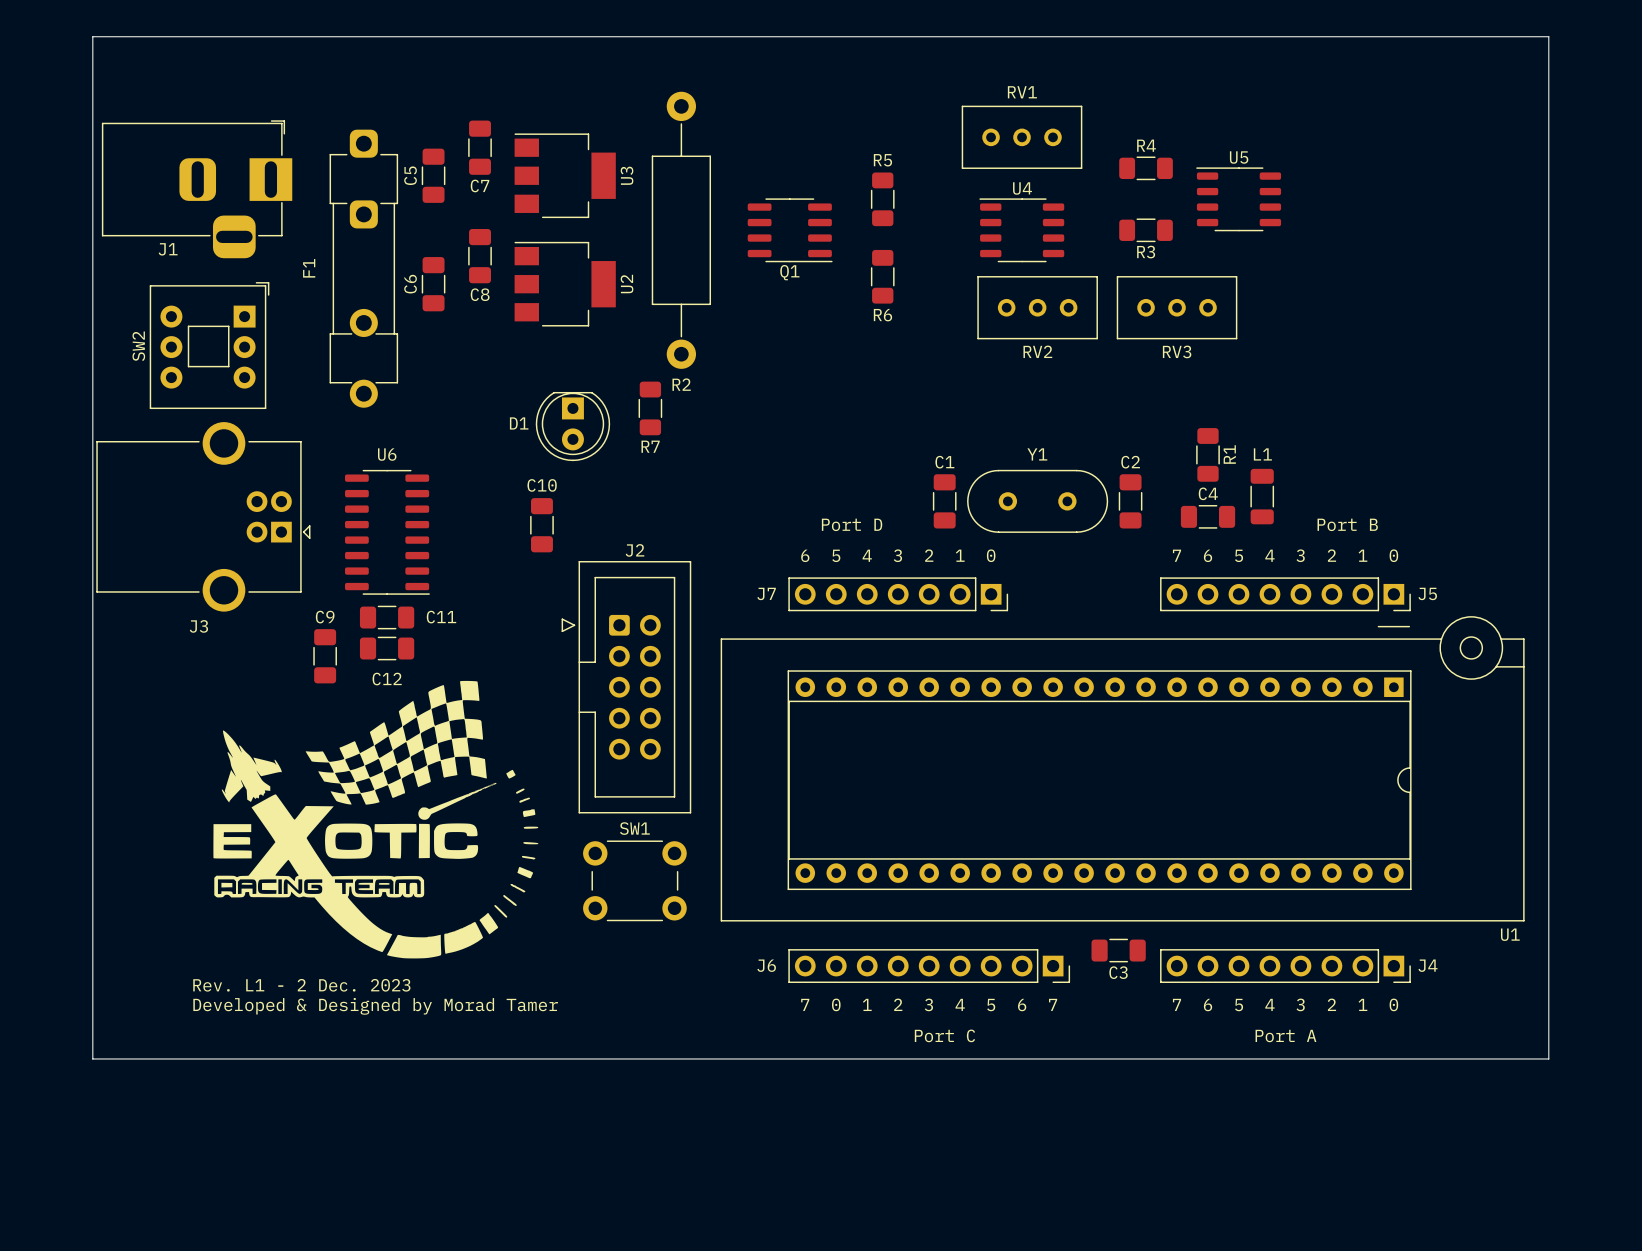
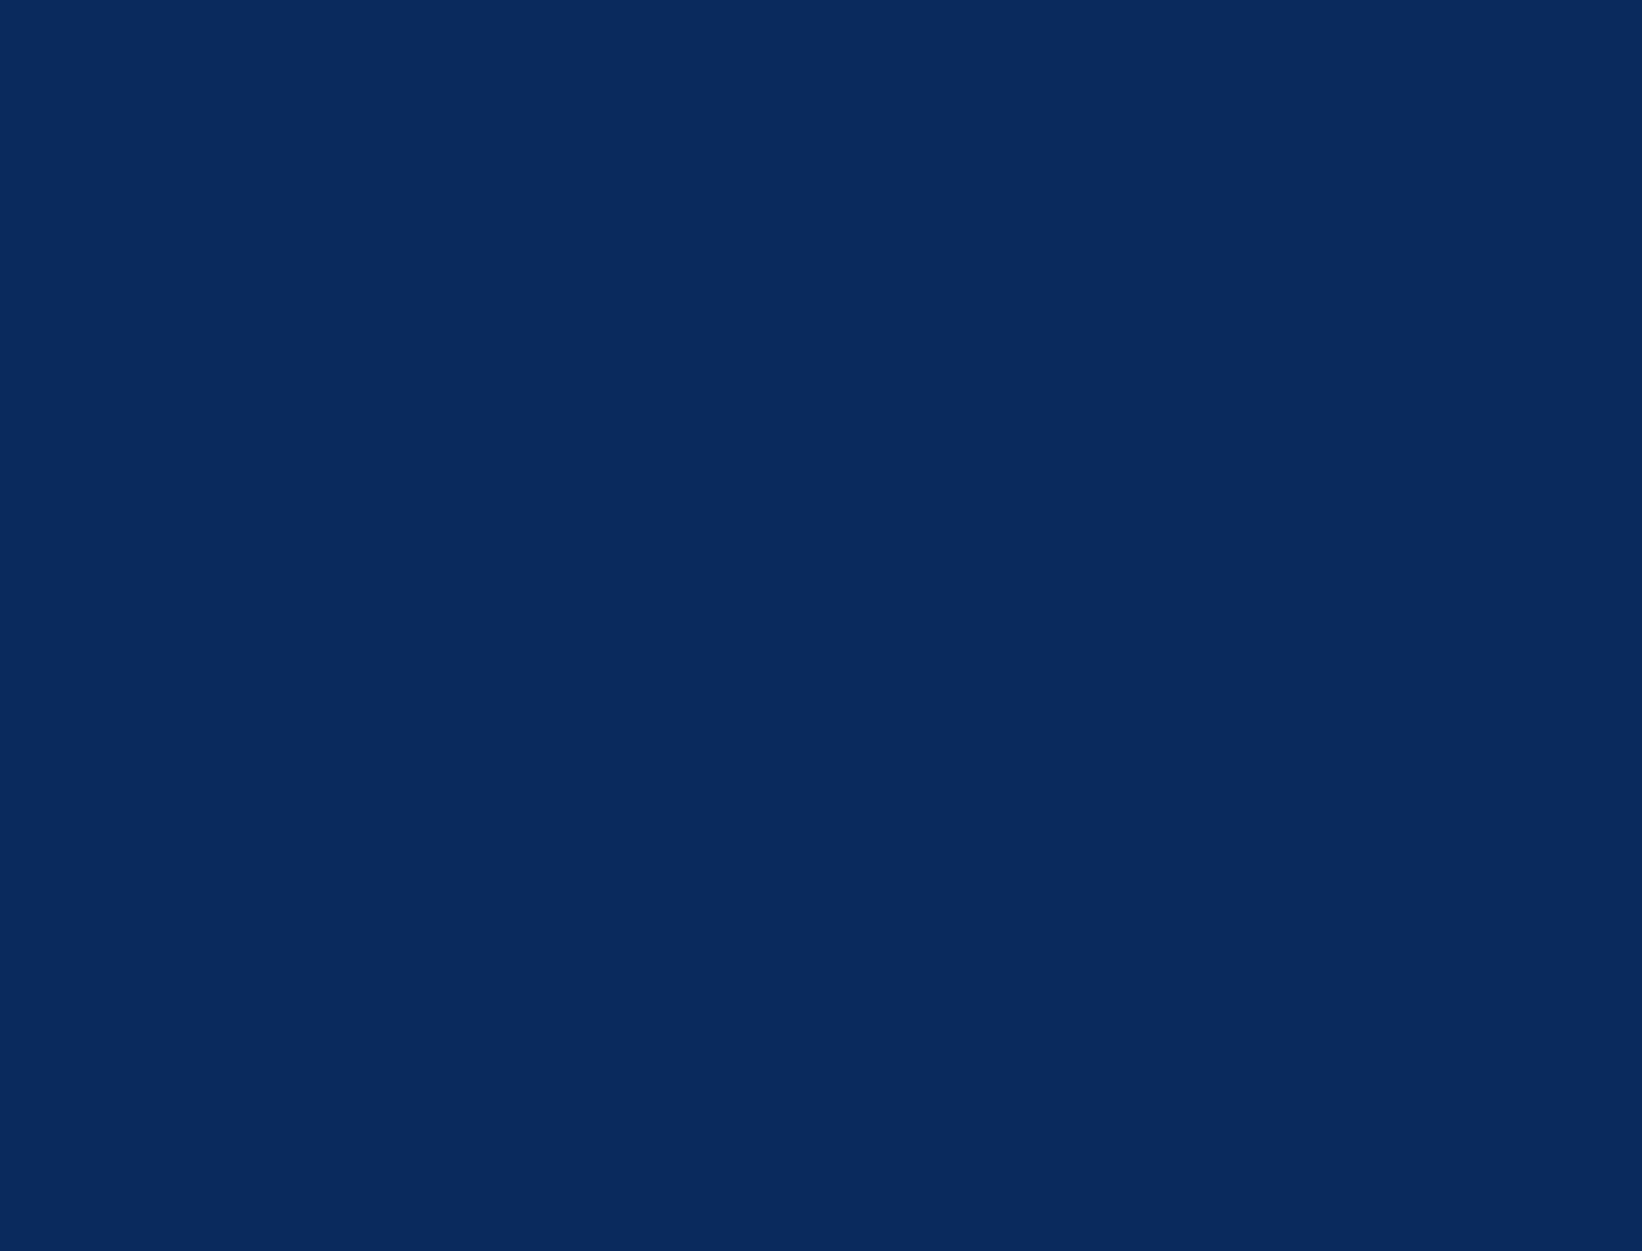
board edge: (92, 36) (1548, 36) (1548, 1058) (92, 1058) (92, 36) -> none
RV1: (1022, 137) -> none
C7: (480, 147) -> none
R4: (1146, 168) -> none
C5: (433, 175) -> none
U3: (565, 175) -> none
J1: (197, 189) -> none
R5: (882, 199) -> none
U5: (1238, 199) -> none
R2: (681, 230) -> none
Q1: (790, 230) -> none
U4: (1021, 230) -> none
R3: (1146, 230) -> none
C8: (480, 256) -> none
F1: (363, 268) -> none
R6: (882, 276) -> none
C6: (433, 284) -> none
U2: (565, 284) -> none
RV2: (1037, 307) -> none
RV3: (1177, 307) -> none
SW2: (209, 345) -> none
R7: (650, 408) -> none
D1: (572, 426) -> none
R1: (1208, 454) -> none
L1: (1262, 496) -> none
C1: (944, 501) -> none
Y1: (1037, 501) -> none
C2: (1130, 501) -> none
J3: (203, 516) -> none
C4: (1208, 516) -> none
text: Port D (852, 524) -> none
text: Port B (1347, 524) -> none
C10: (541, 525) -> none
U6: (387, 532) -> none
text: 6 (805, 555) -> none
text: 5 (836, 555) -> none
text: 4 (867, 555) -> none
text: 3 (897, 555) -> none
text: 2 (929, 555) -> none
text: 1 (960, 555) -> none
text: 0 (991, 555) -> none
text: 7 (1176, 555) -> none
text: 6 (1208, 555) -> none
text: 5 (1239, 555) -> none
text: 4 (1269, 555) -> none
text: 3 (1300, 555) -> none
text: 2 (1331, 555) -> none
text: 1 (1362, 555) -> none
text: 0 (1393, 555) -> none
J7: (898, 594) -> none
J5: (1285, 594) -> none
C11: (387, 617) -> none
C12: (387, 648) -> none
C9: (325, 656) -> none
drawing: [213, 680, 539, 959] -> none
J2: (626, 687) -> none
U1: (1122, 768) -> none
SW1: (634, 880) -> none
C3: (1118, 950) -> none
J6: (929, 966) -> none
J4: (1285, 966) -> none
text: Rev. L1 - 2 Dec. 2023 (301, 985) -> none
text: 7 (805, 1004) -> none
text: 0 (836, 1004) -> none
text: 1 (867, 1004) -> none
text: 2 (898, 1004) -> none
text: 3 (928, 1004) -> none
text: 4 (960, 1004) -> none
text: 7 (1053, 1004) -> none
text: 7 (1176, 1004) -> none
text: 4 (1269, 1004) -> none
text: 3 (1300, 1004) -> none
text: 2 (1331, 1004) -> none
text: 1 (1362, 1004) -> none
text: 0 (1393, 1004) -> none
text: 5 (991, 1005) -> none
text: 6 (1022, 1005) -> none
text: 6 (1208, 1005) -> none
text: 5 (1239, 1005) -> none
text: Developed & Designed by Morad Tamer (375, 1006) -> none
text: Port C (944, 1035) -> none
text: Port A (1285, 1036) -> none

